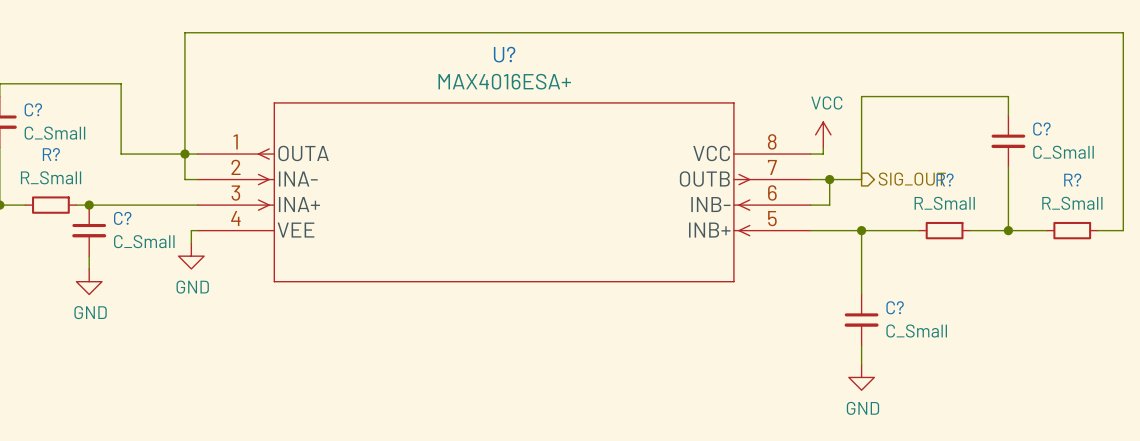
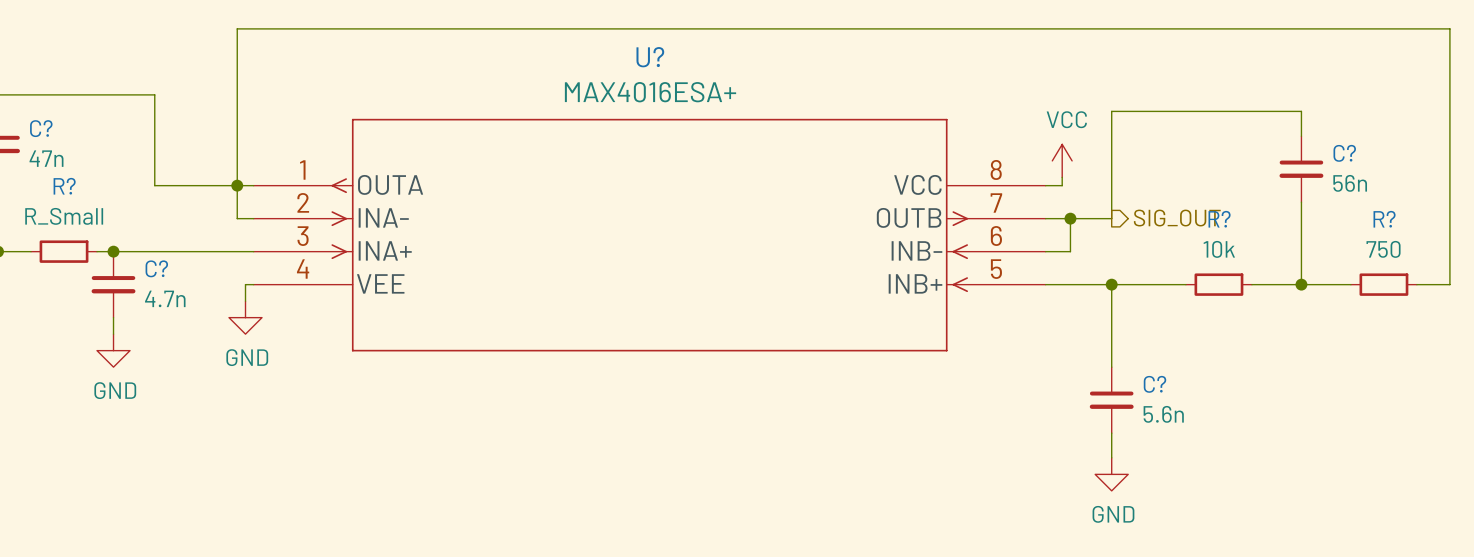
C? value: C_Small (54, 133) -> 47n (46, 158)
C? value: C_Small (1063, 152) -> 56n (1350, 183)
R? value: R_Small (944, 203) -> 10k (1219, 249)
R? value: R_Small (1072, 203) -> 750 (1383, 249)
C? value: C_Small (144, 241) -> 4.7n (165, 298)
C? value: C_Small (916, 331) -> 5.6n (1163, 414)

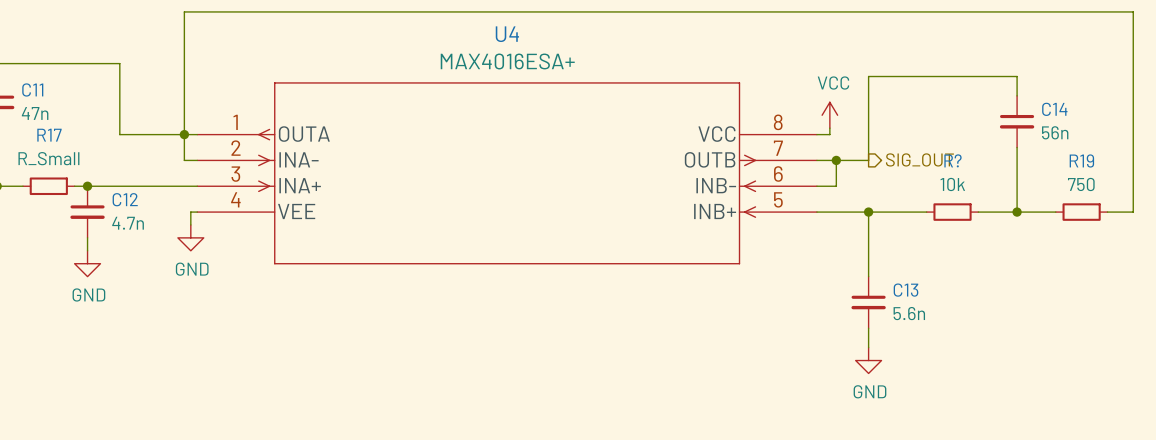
U? name: U? (650, 57) -> U4 (507, 34)
C? name: C? (41, 128) -> C11 (32, 89)
C? name: C? (1344, 153) -> C14 (1054, 109)
R? name: R? (64, 186) -> R17 (49, 135)
R? name: R? (1384, 219) -> R19 (1081, 160)
C? name: C? (156, 268) -> C12 (125, 199)
C? name: C? (1154, 384) -> C13 (906, 290)

